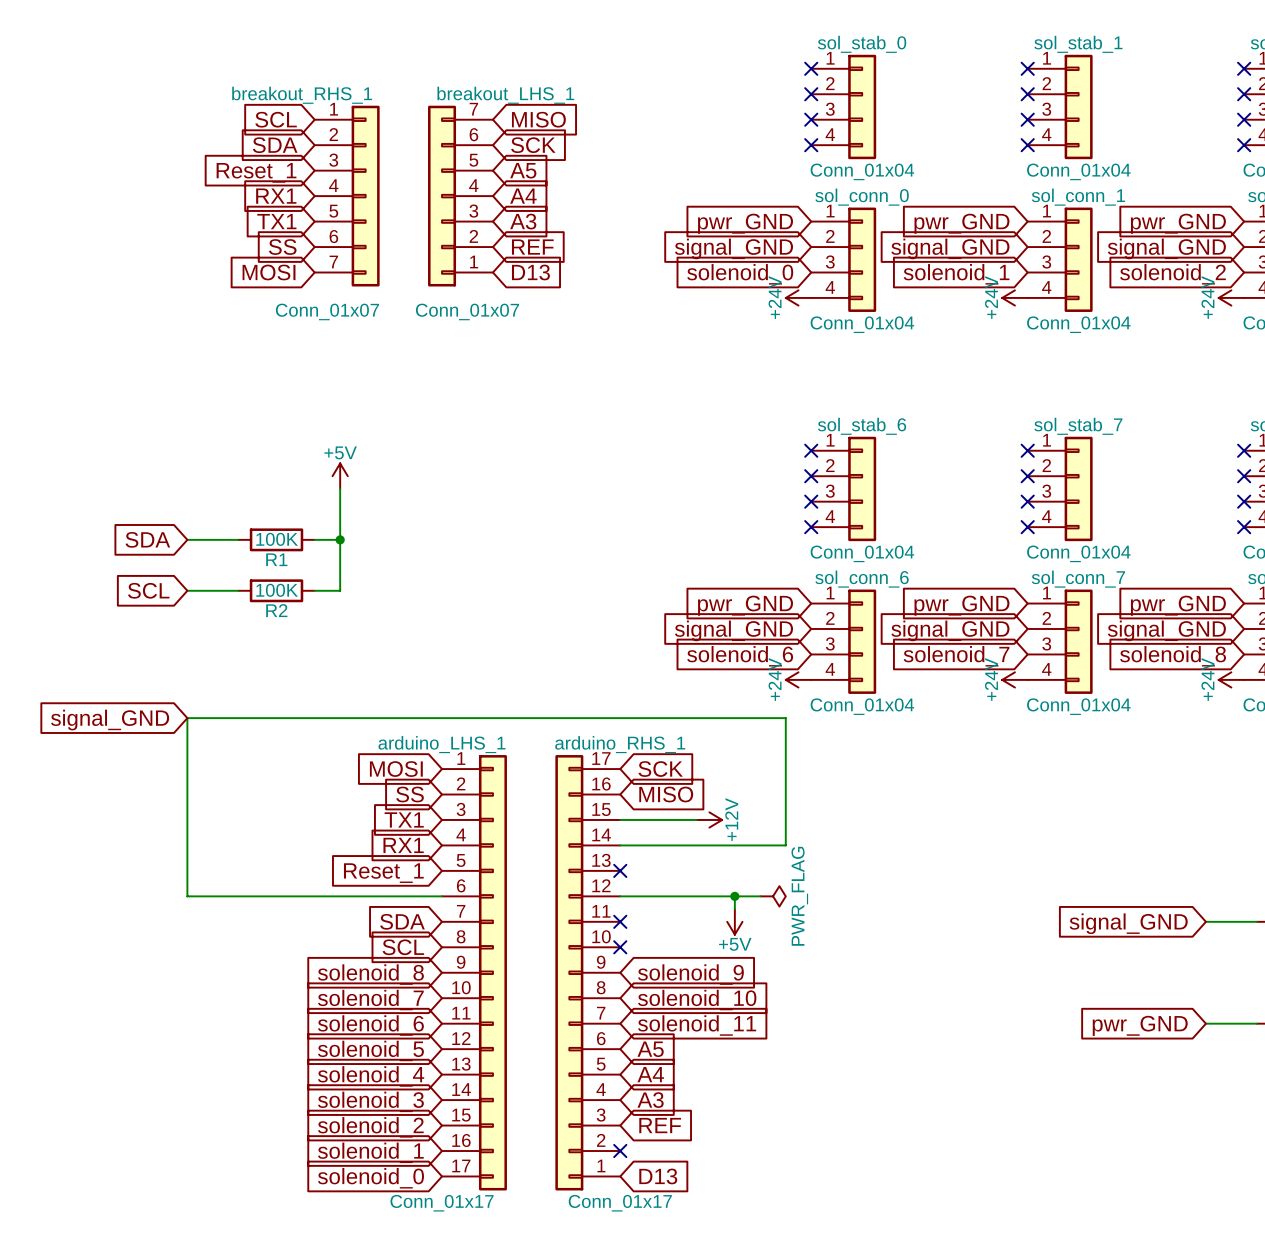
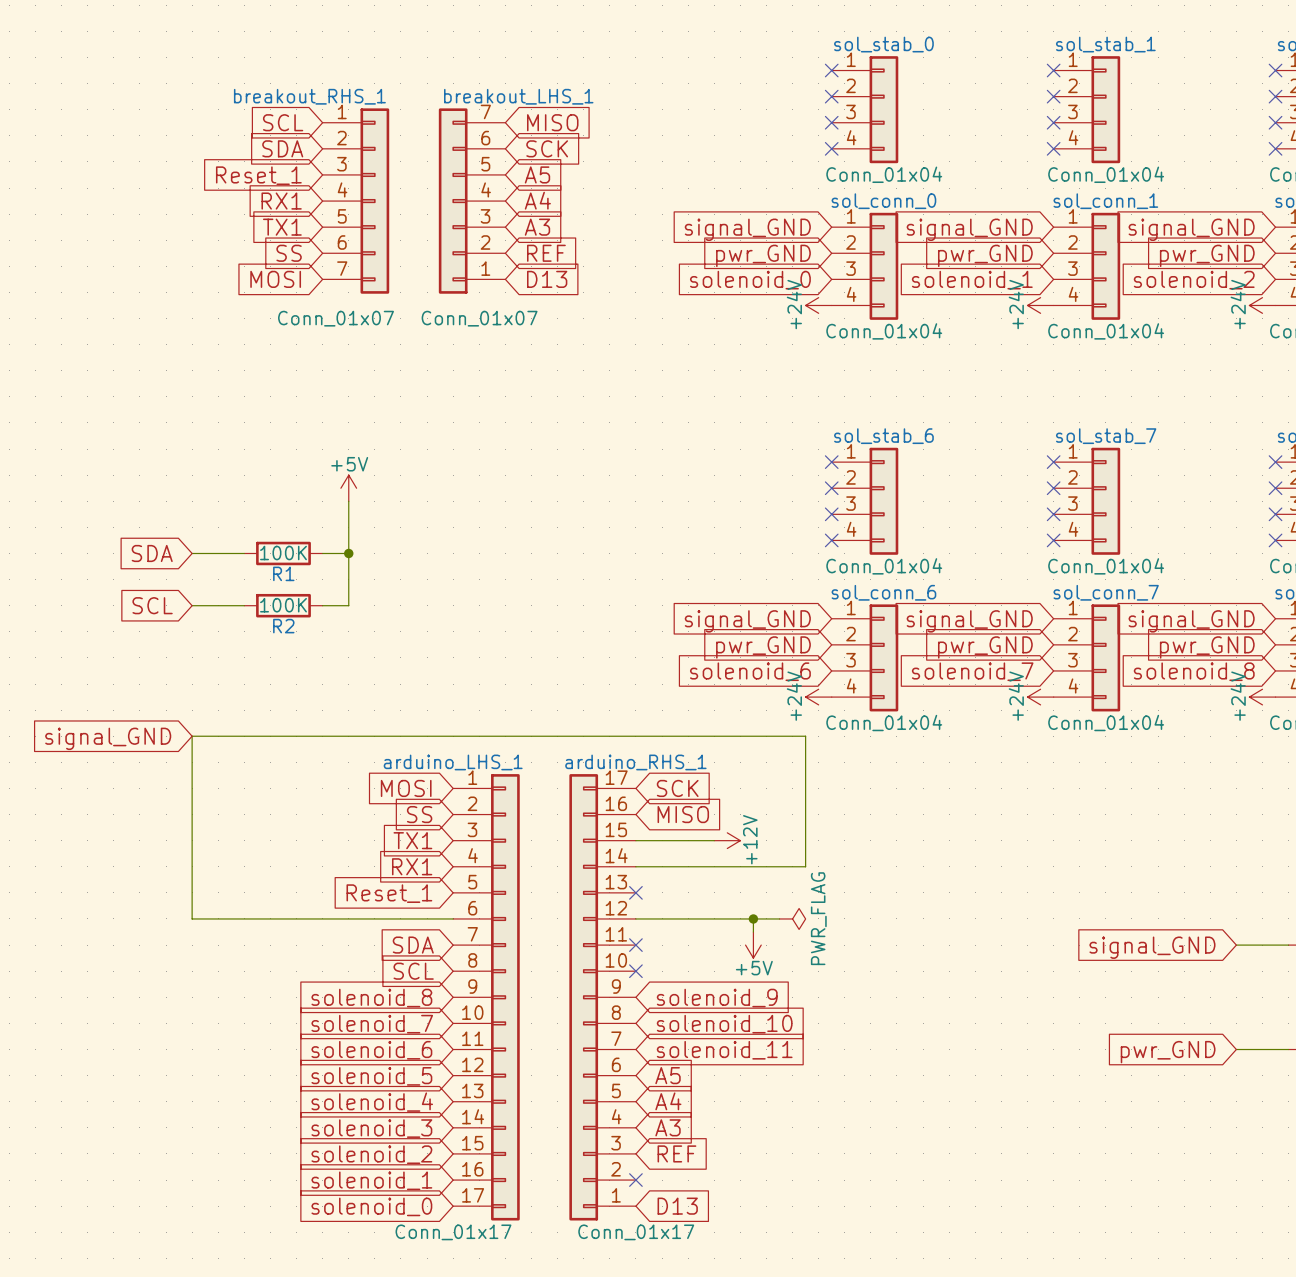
global label: pwr_GND (745, 223) -> signal_GND (747, 229)
global label: pwr_GND (961, 223) -> signal_GND (969, 229)
global label: pwr_GND (1178, 223) -> signal_GND (1191, 229)
global label: signal_GND (733, 248) -> pwr_GND (763, 255)
global label: signal_GND (950, 248) -> pwr_GND (985, 255)
global label: signal_GND (1166, 248) -> pwr_GND (1207, 255)
global label: pwr_GND (745, 605) -> signal_GND (747, 621)
global label: pwr_GND (961, 605) -> signal_GND (969, 621)
global label: pwr_GND (1178, 605) -> signal_GND (1191, 621)
global label: signal_GND (733, 630) -> pwr_GND (763, 647)
global label: signal_GND (950, 630) -> pwr_GND (985, 647)
global label: signal_GND (1166, 630) -> pwr_GND (1207, 647)

